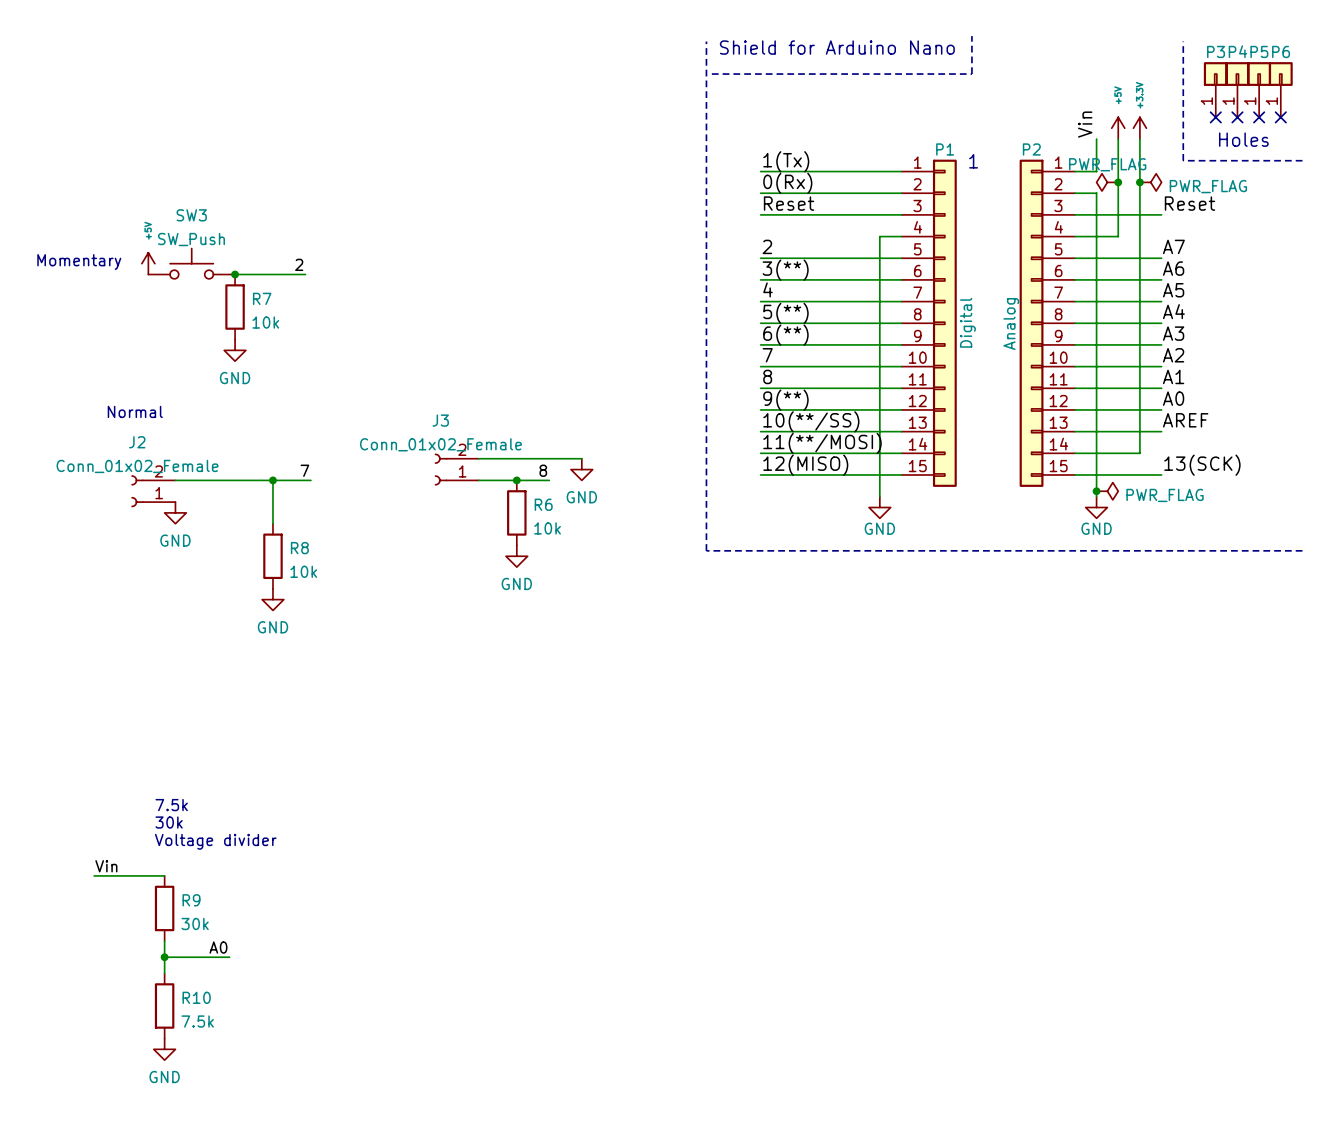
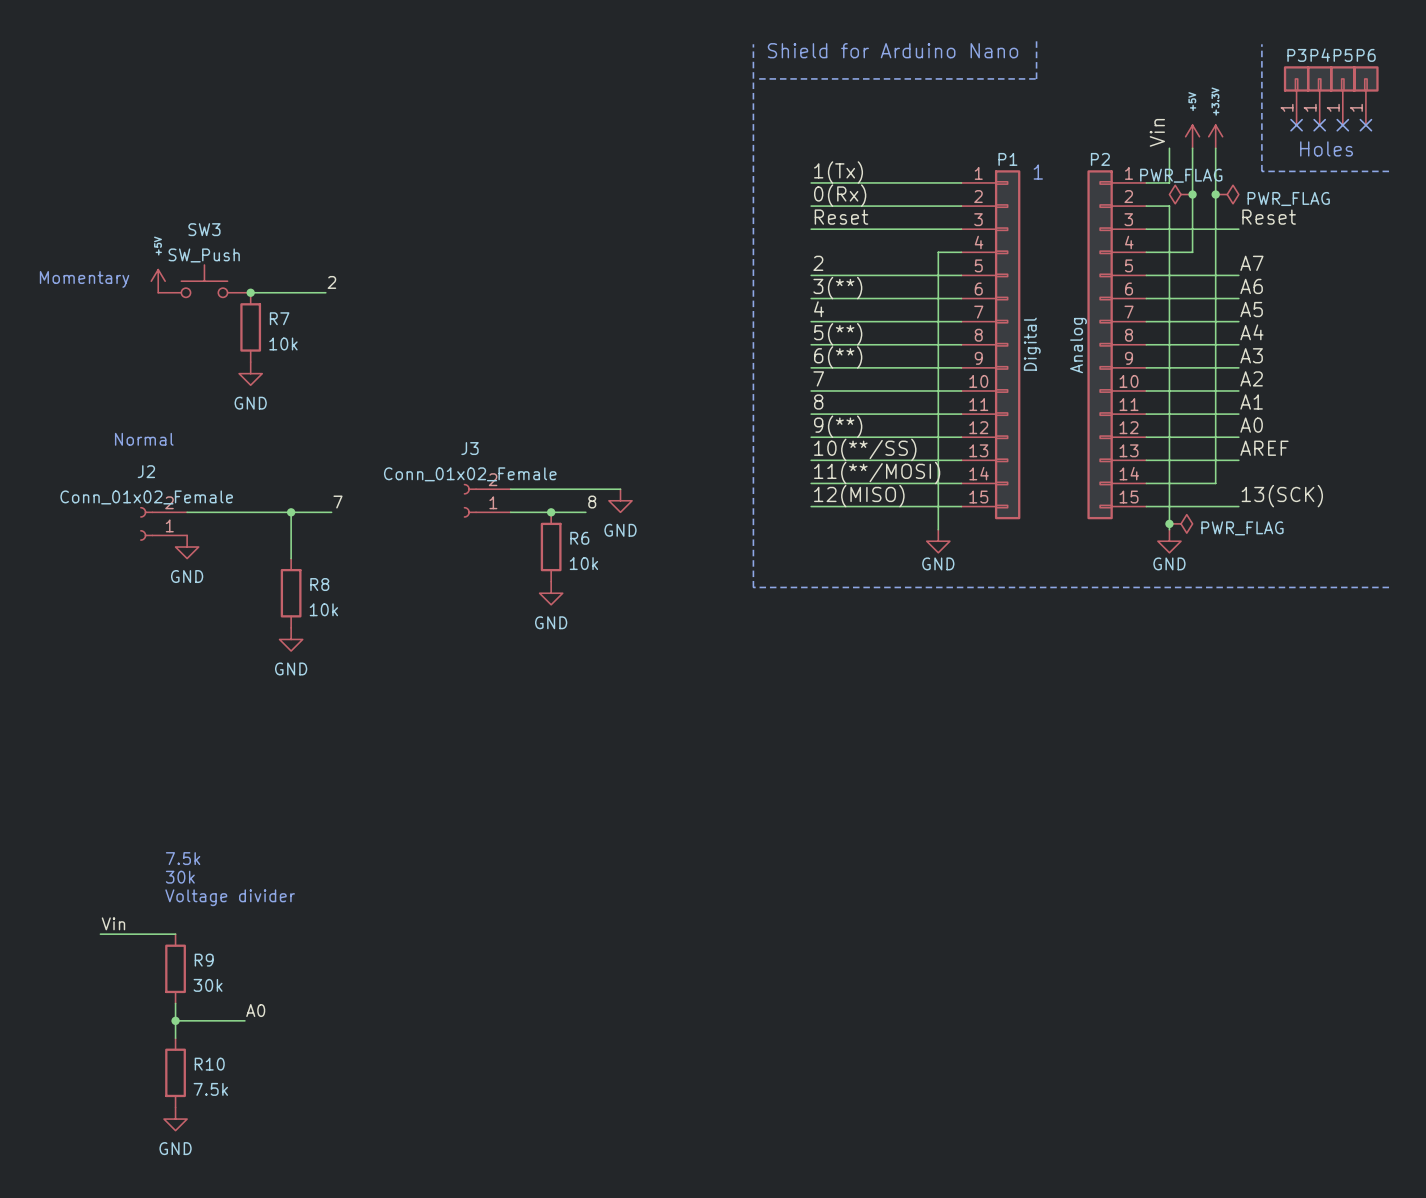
label position: 2 (299, 264) -> 2 (331, 282)
label position: 7 (304, 470) -> 7 (337, 502)
label position: 8 (543, 470) -> 8 (592, 502)
label position: A0 (218, 947) -> A0 (255, 1010)

